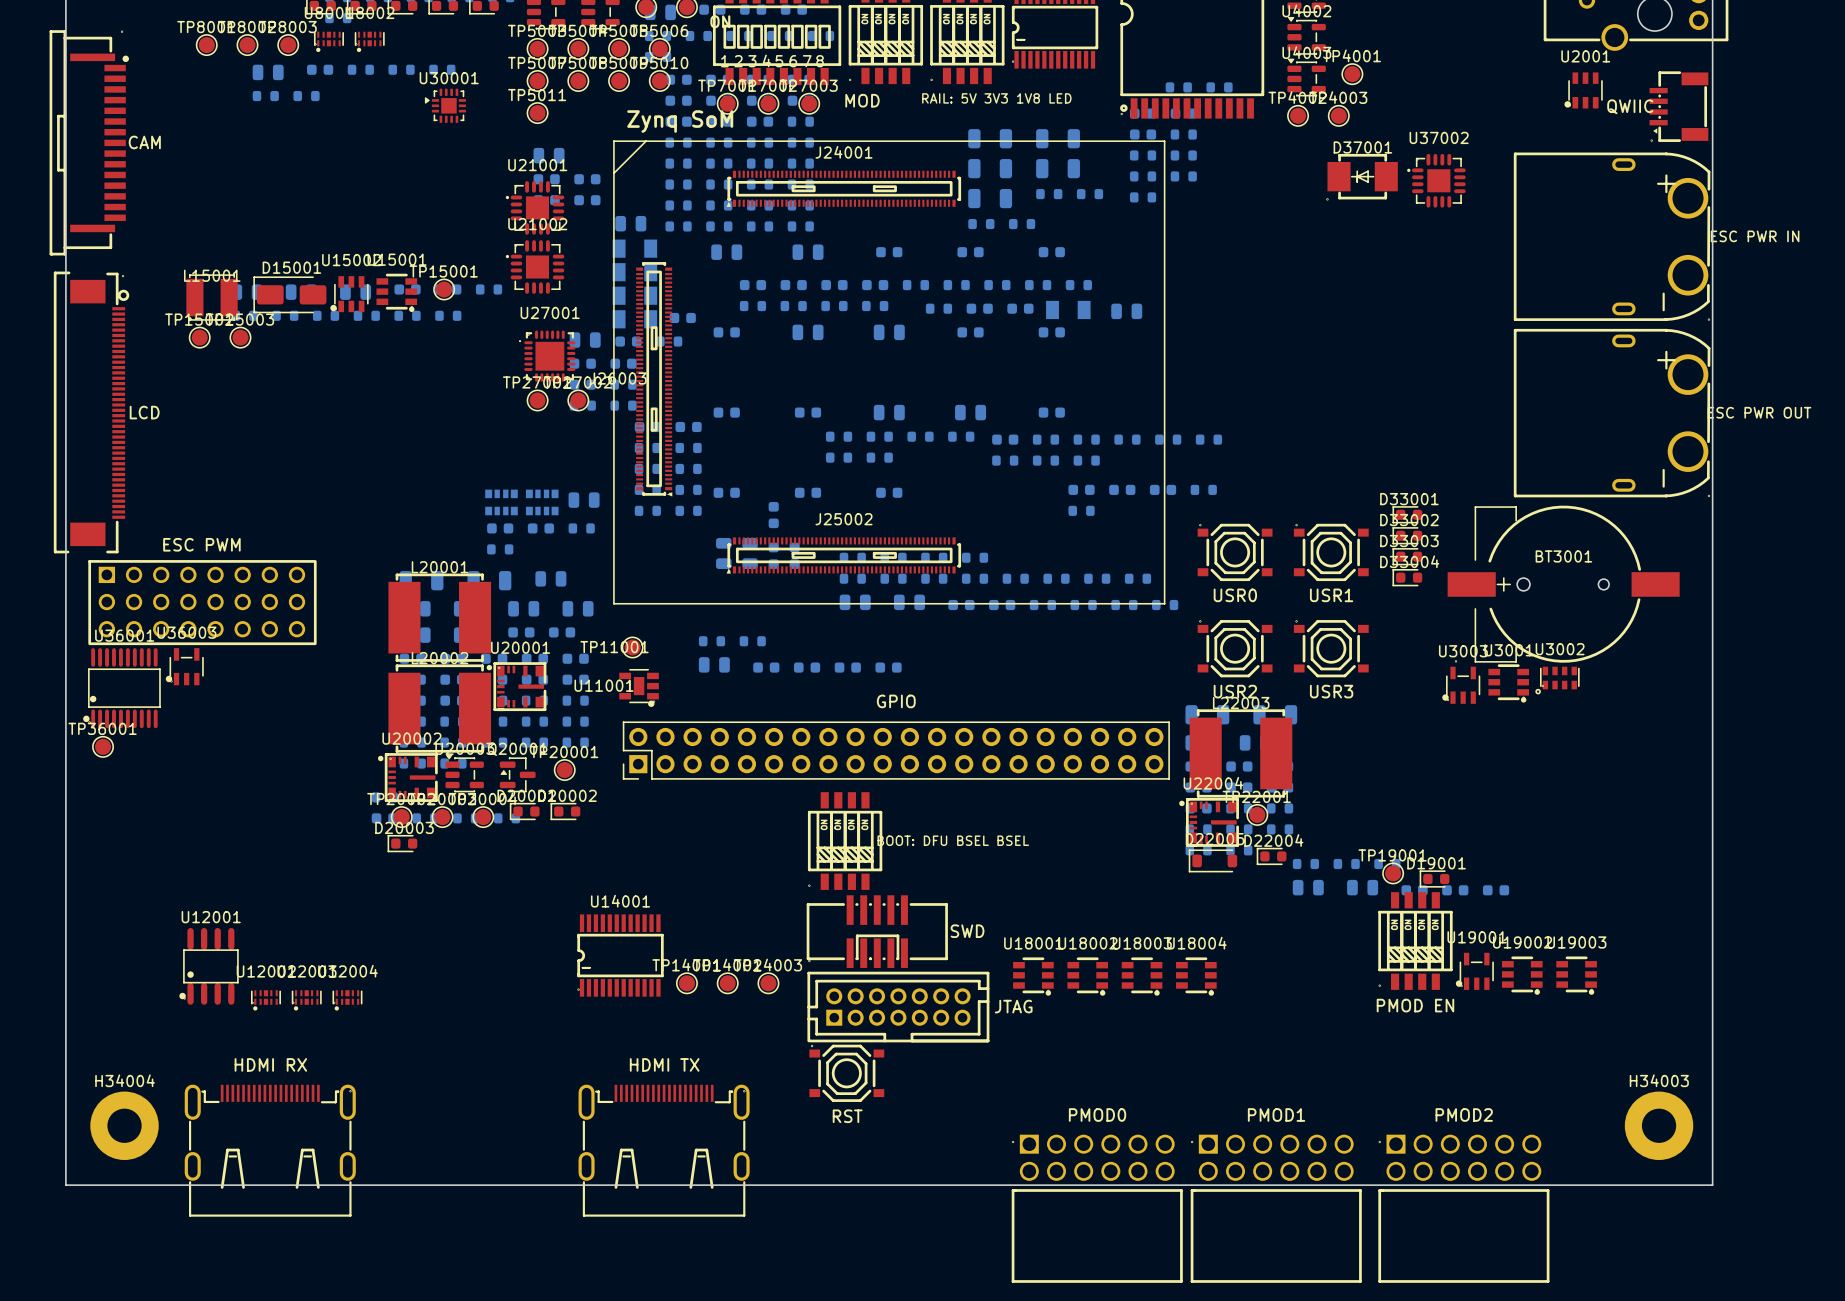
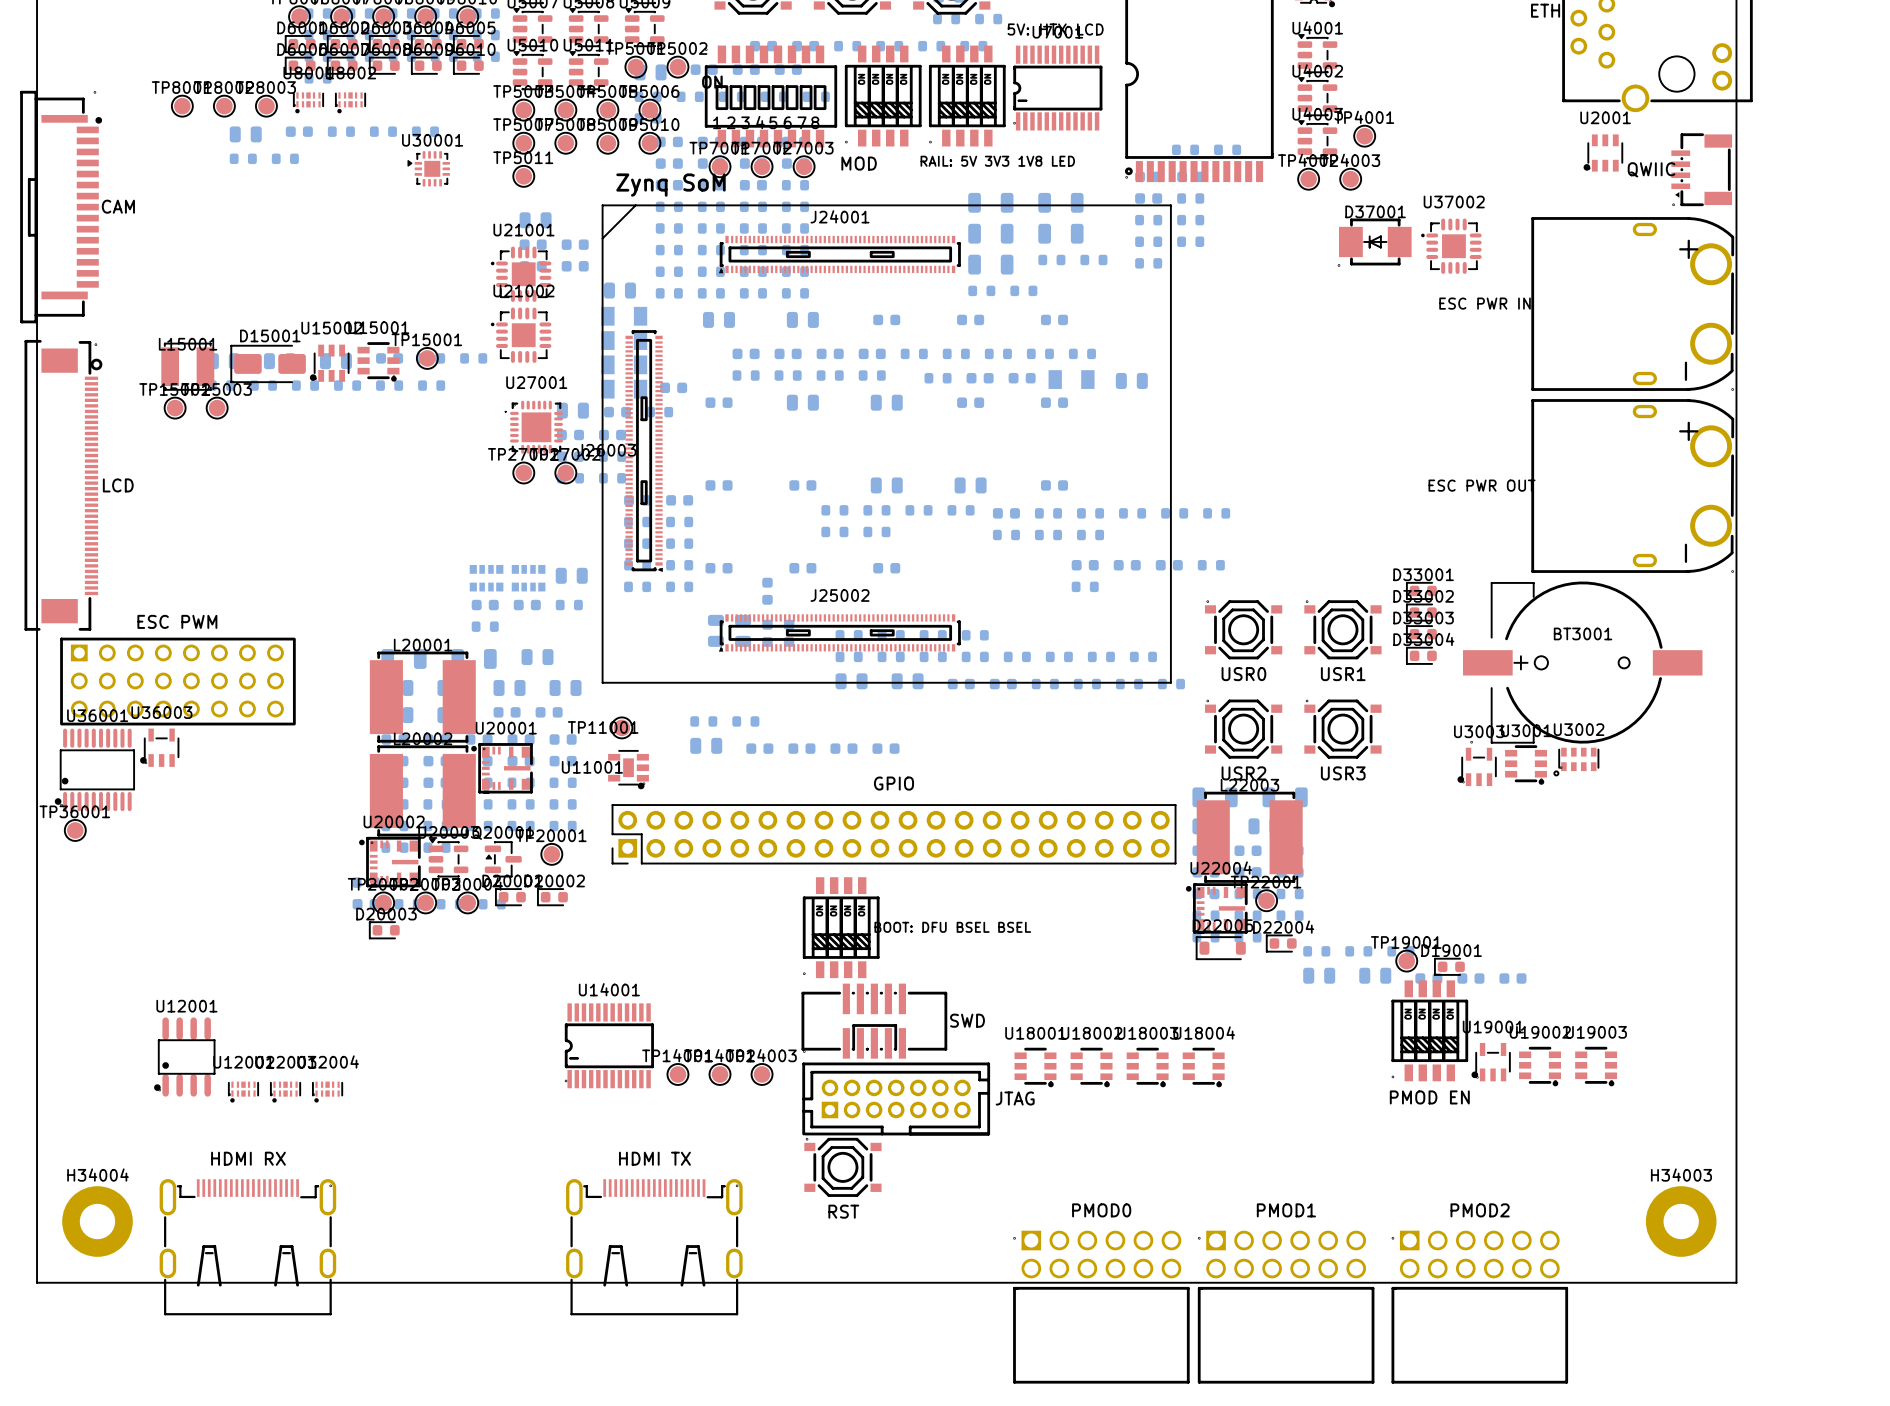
text: none -> ESC PWR IN (1485, 303)
text: ESC PWR IN (1755, 236) -> none
text: none -> ESC PWR OUT (1482, 485)
text: ESC PWR OUT (1759, 412) -> none

